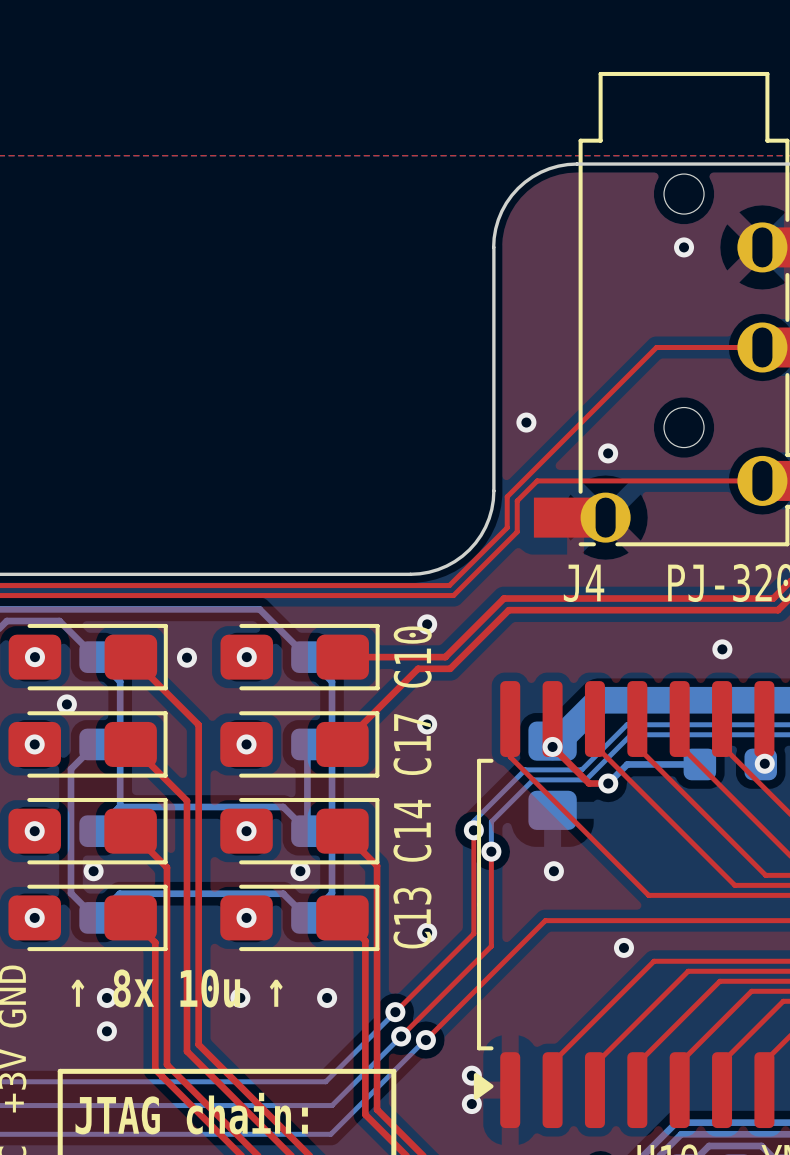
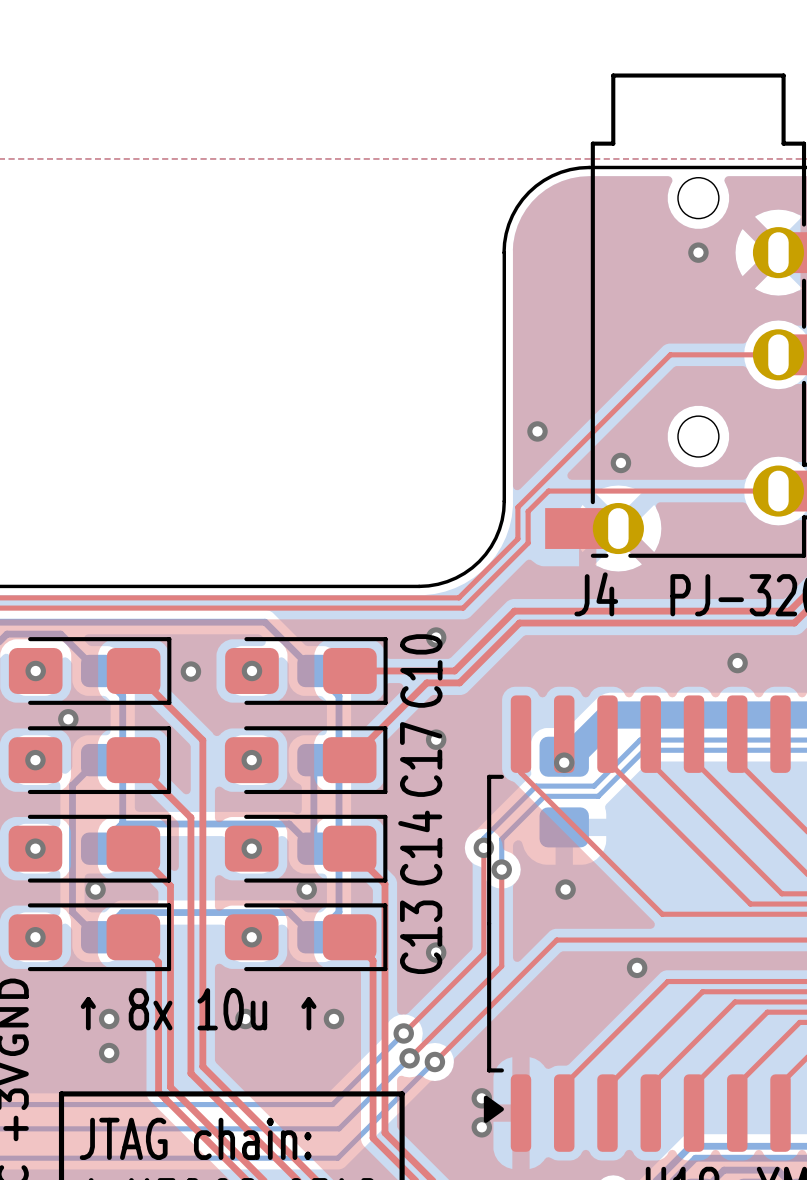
top track: (552, 746) (589, 783) (608, 783) -> none
via: (764, 763) -> none
bottom track: (699, 764) (627, 764) (608, 783) -> none
part: (730, 764) -> none
via: (608, 783) -> none

